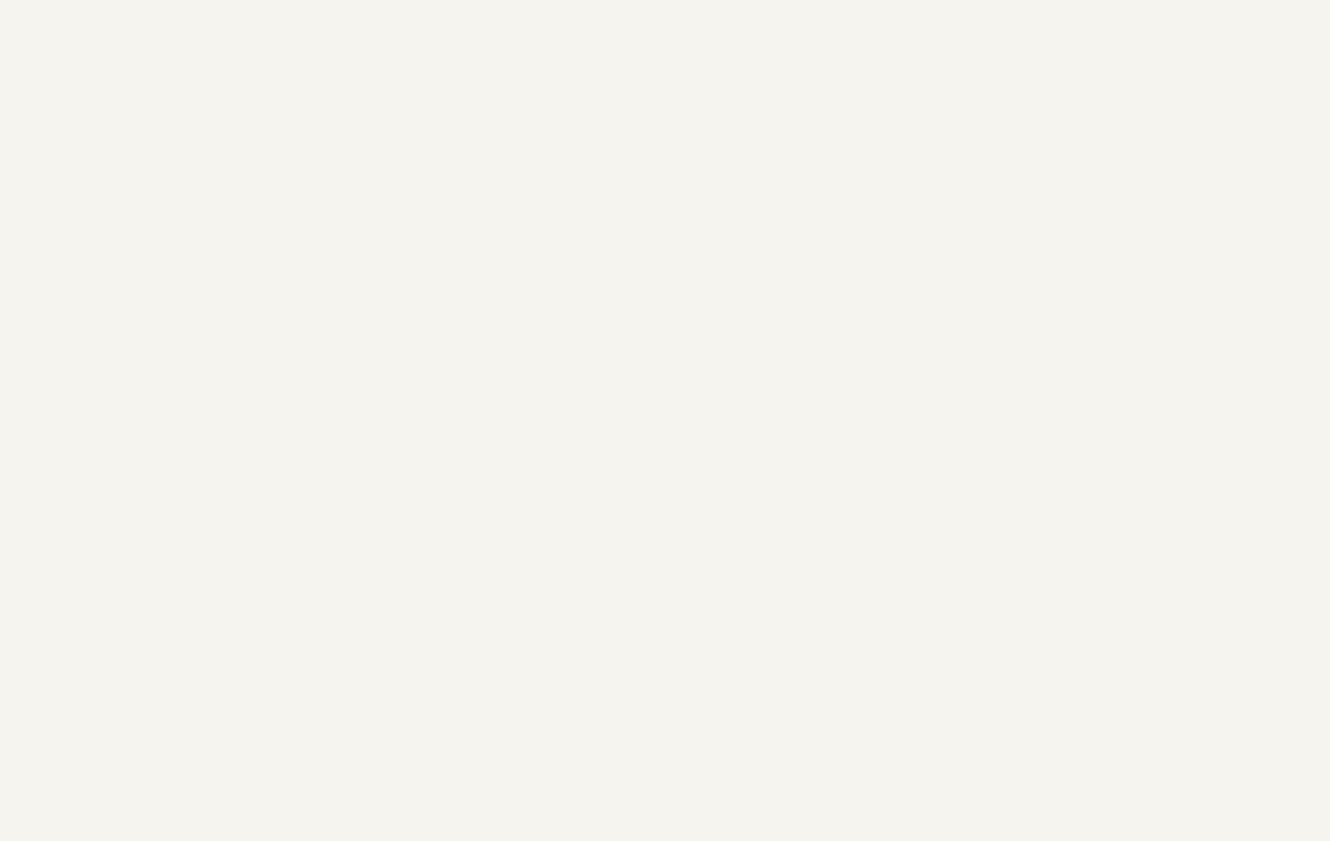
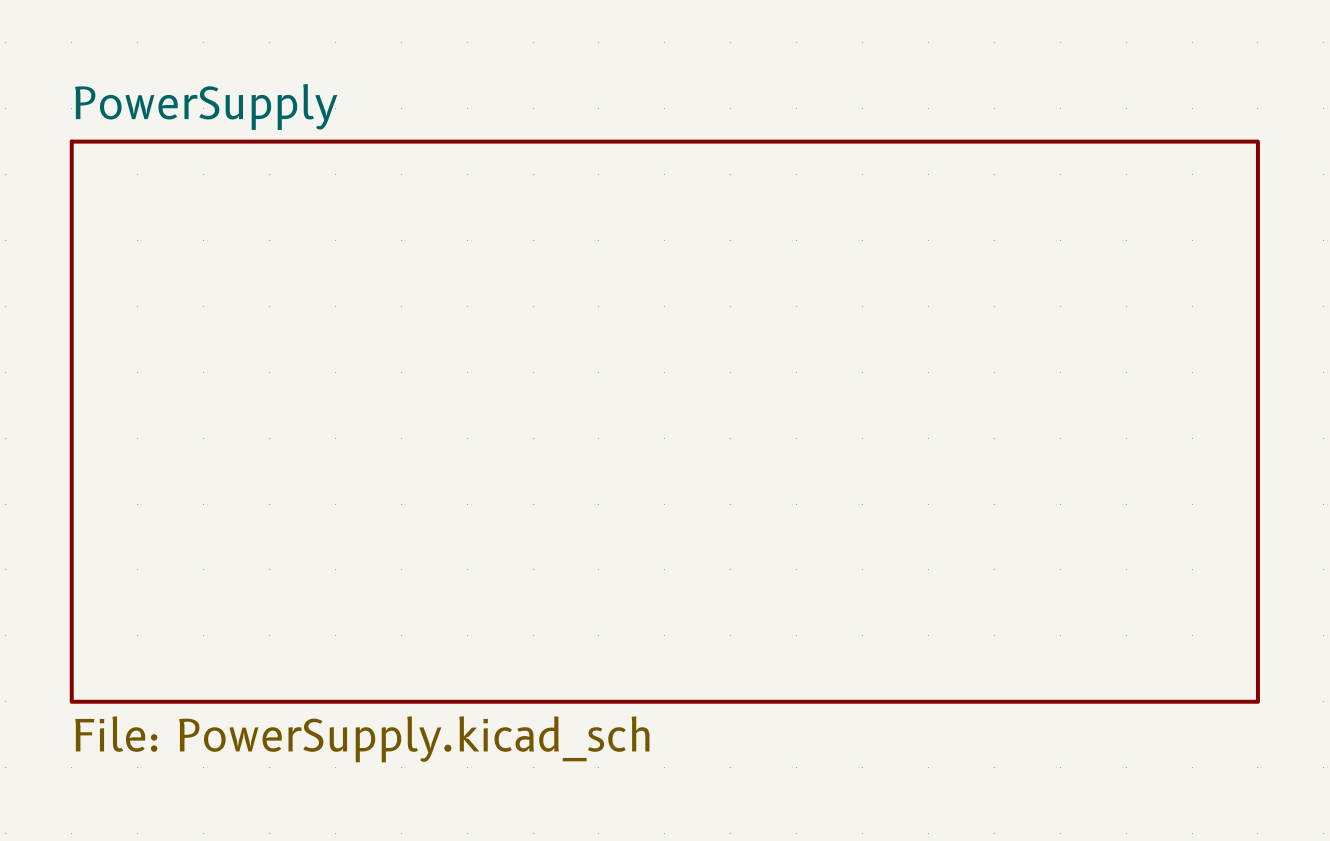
sheet PowerSupply: none -> File: PowerSupply.kicad_sch (664, 421)

